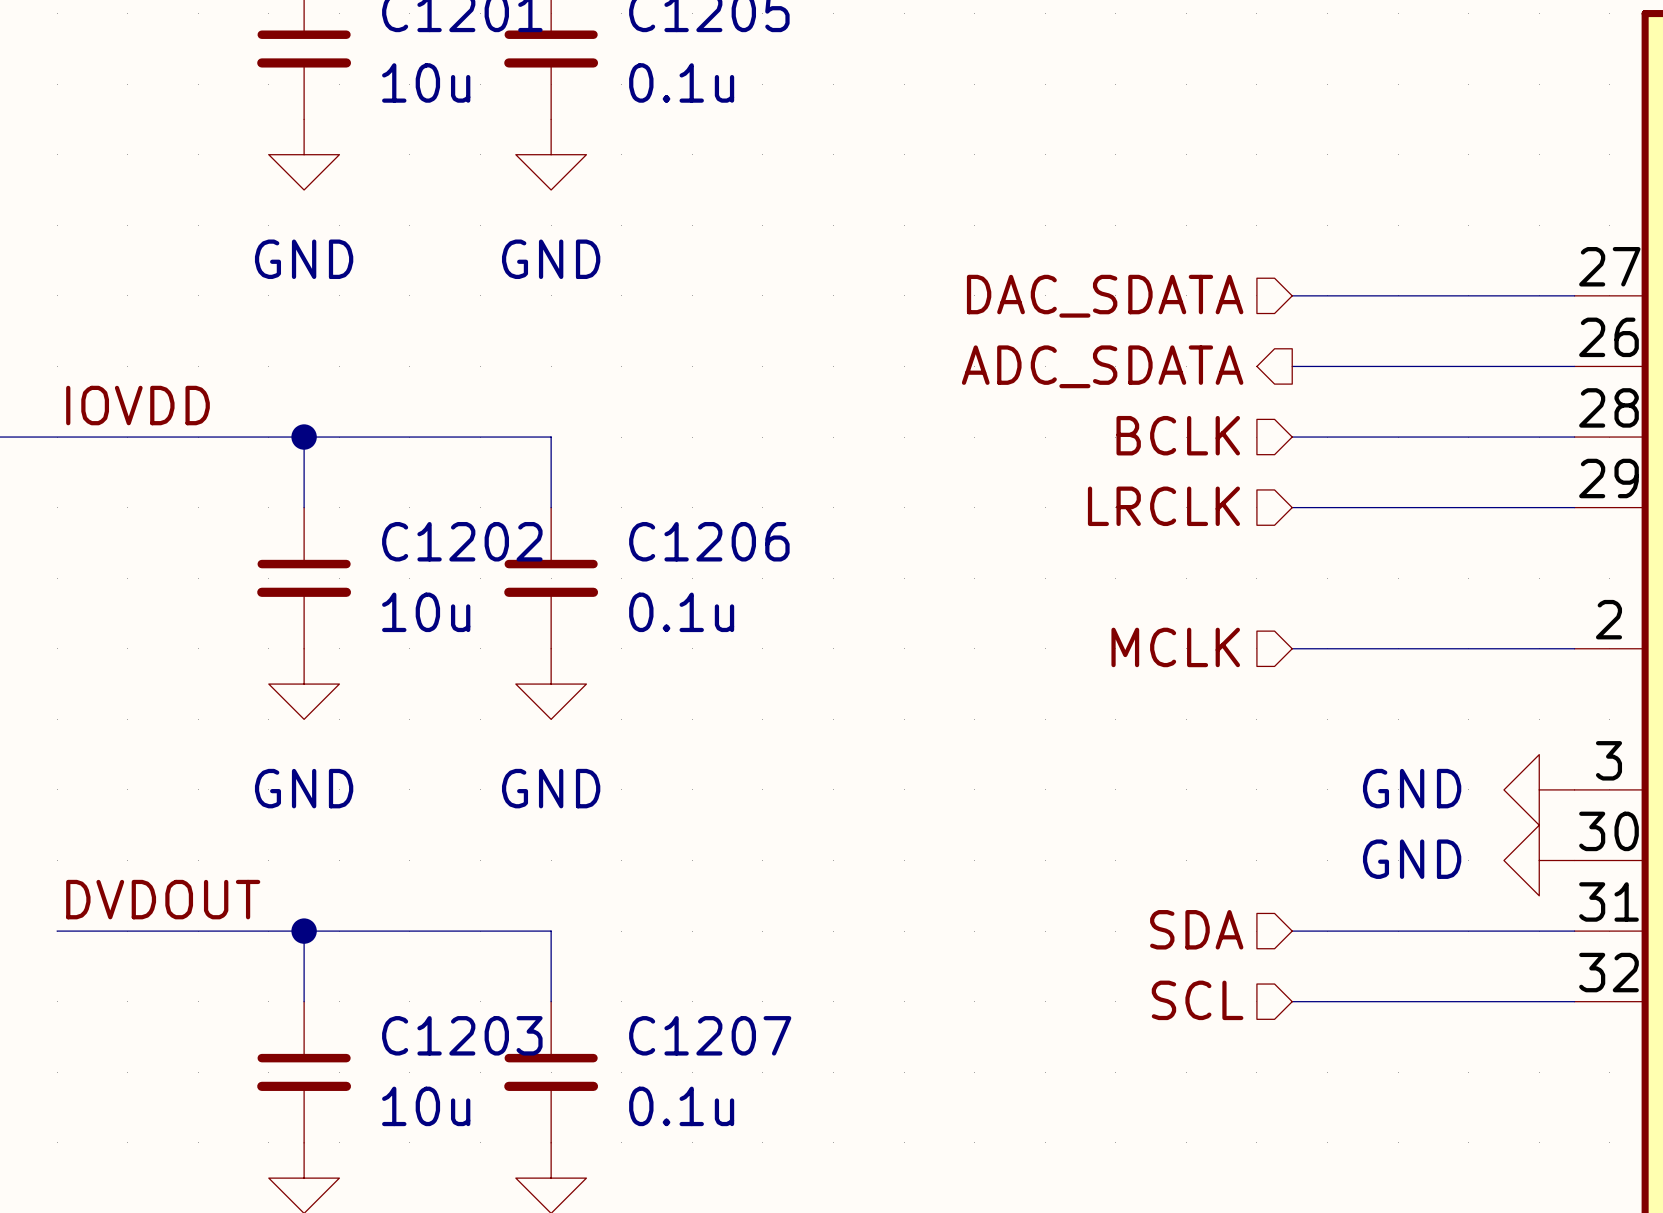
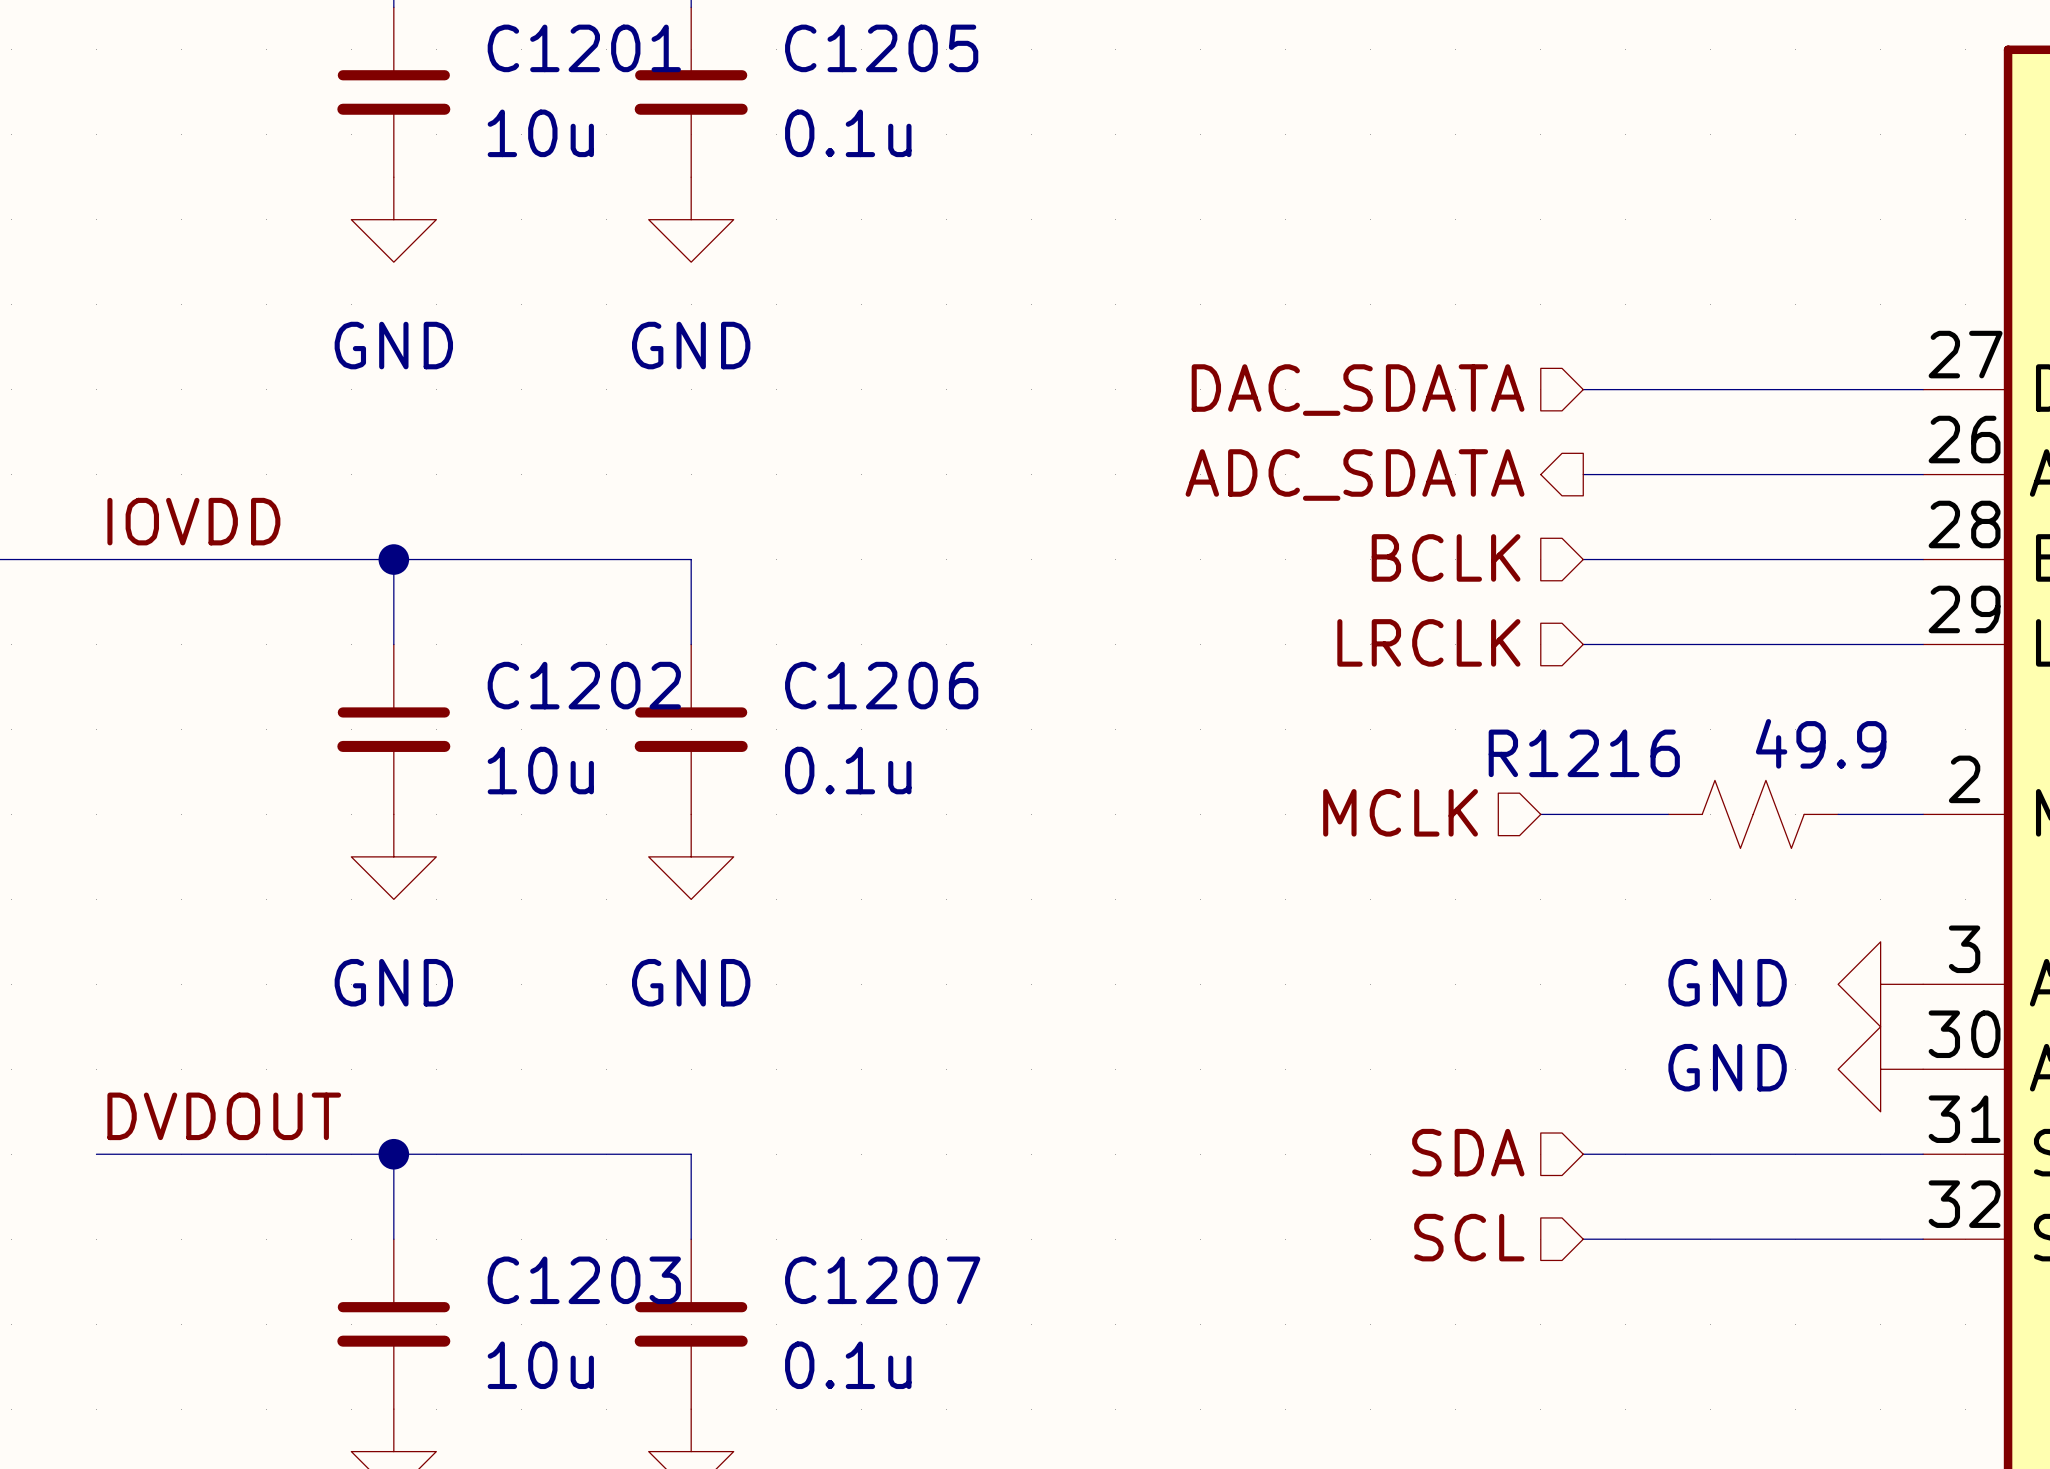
hierarchical label position: MCLK (1175, 647) -> MCLK (1400, 812)
wire: none -> (1540, 814) (1583, 814)
wire: (1362, 648) (1503, 648) -> none
R1216: none -> 49.9 (1753, 814)

